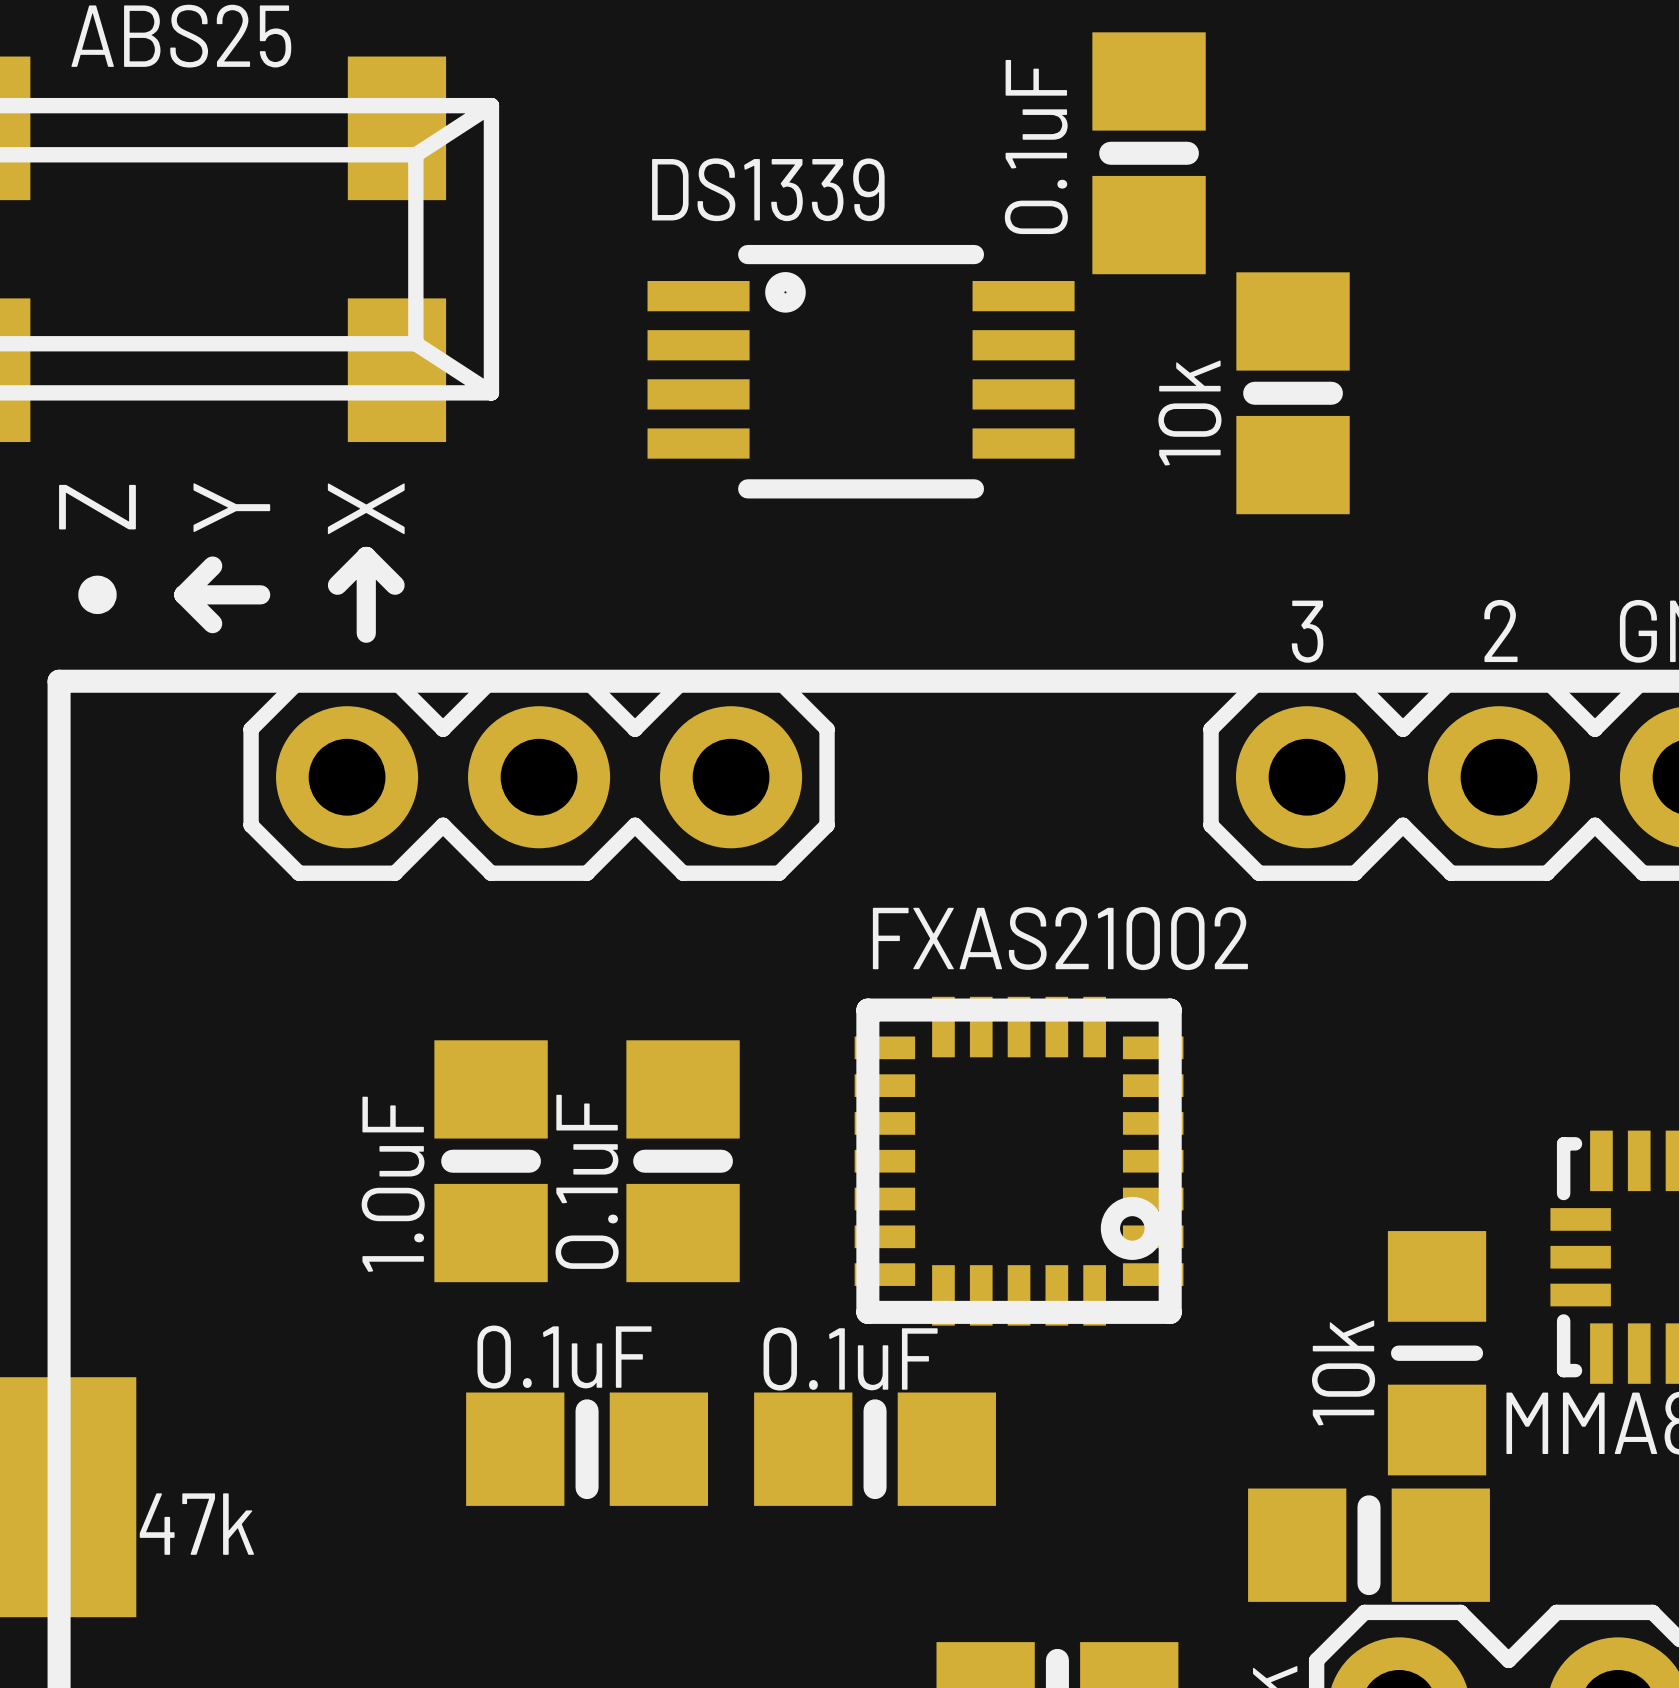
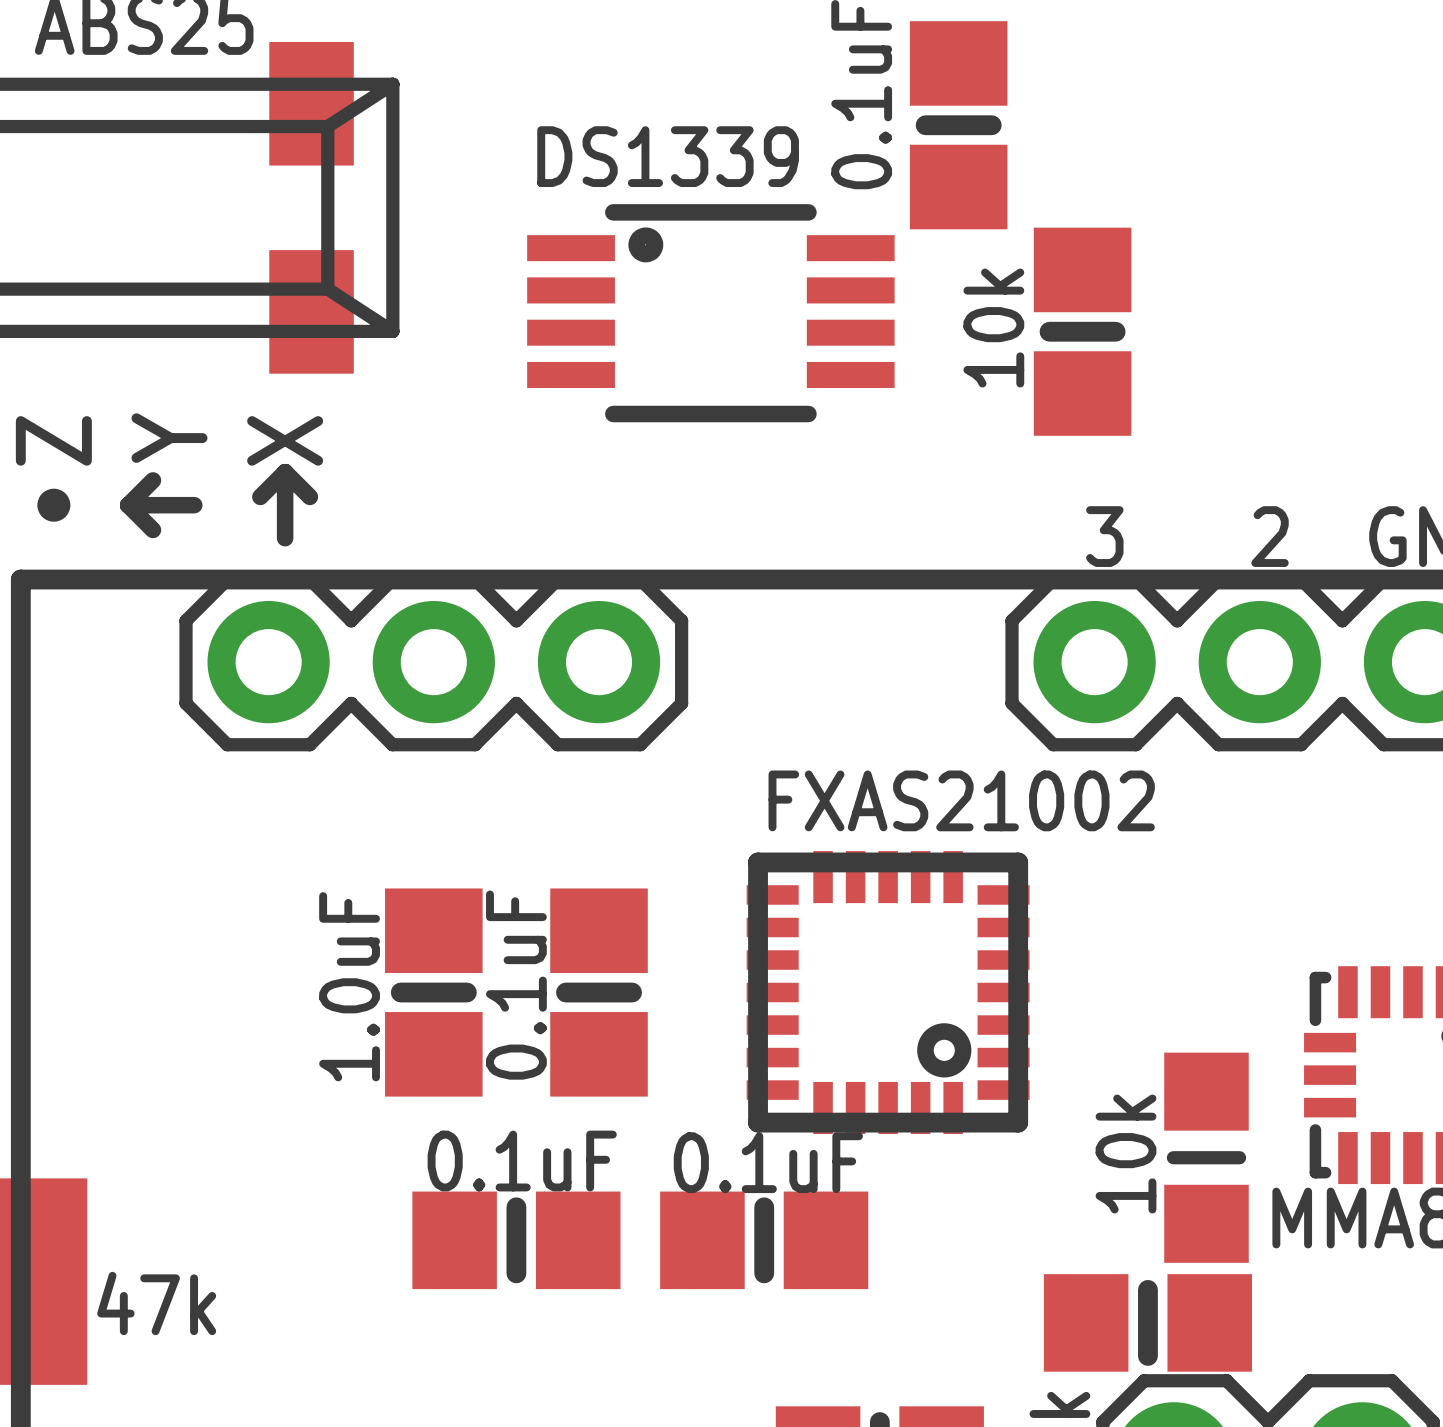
text position: FXAS21002 (1060, 938) -> FXAS21002 (961, 800)
part position: (491, 1161) -> (433, 992)
part position: (683, 1161) -> (599, 992)
part position: (1019, 1161) -> (888, 992)
text position: 0.1uF (587, 1181) -> 0.1uF (516, 985)
text position: 1.0uF (393, 1184) -> 1.0uF (349, 986)
text position: 0.1uF (564, 1357) -> 0.1uF (522, 1161)
text position: 0.1uF (850, 1359) -> 0.1uF (768, 1162)
part position: (587, 1449) -> (516, 1240)
part position: (875, 1449) -> (764, 1240)

